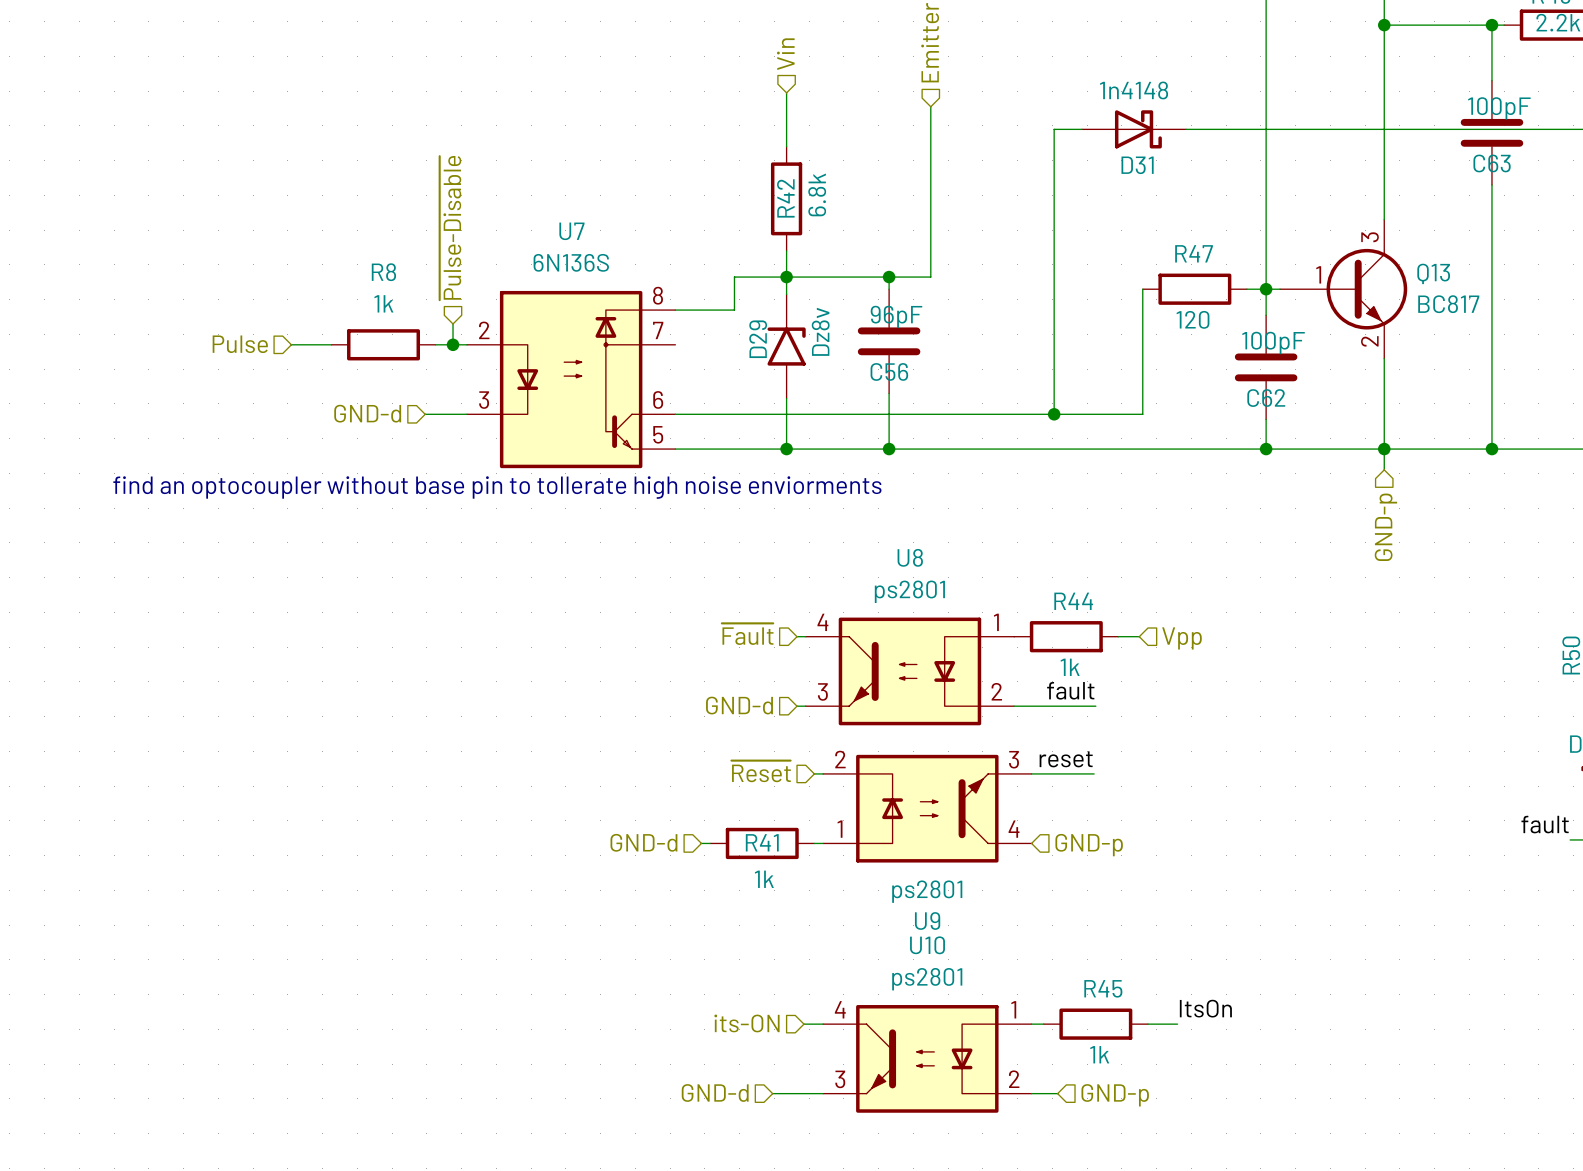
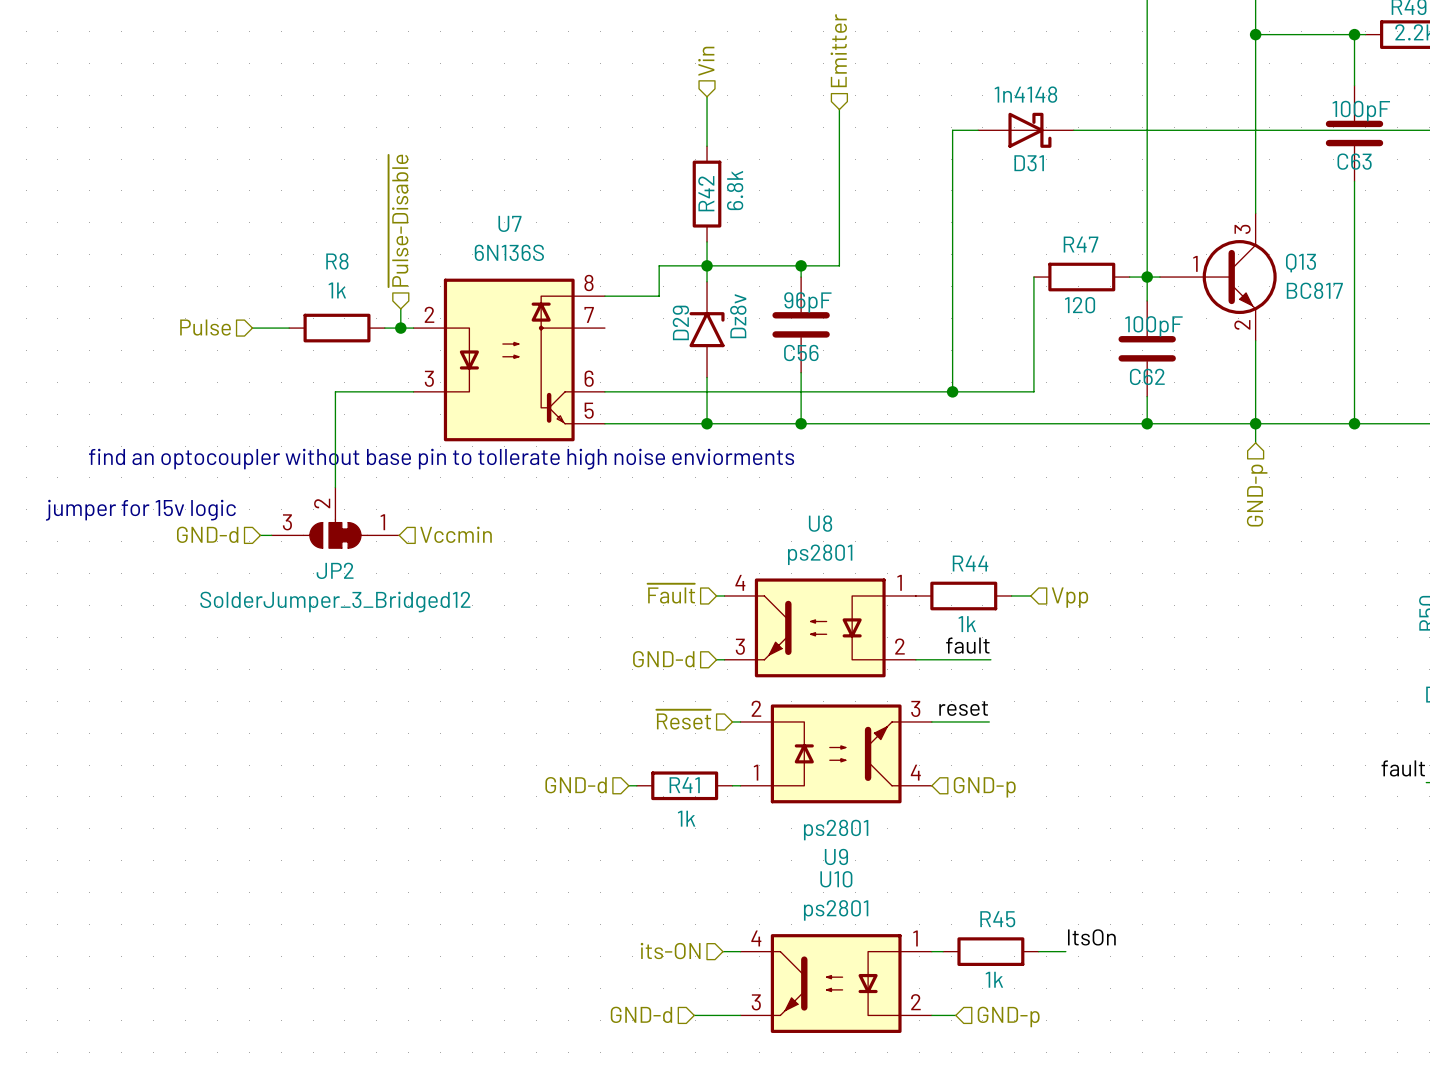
hierarchical label position: GND-d (367, 413) -> GND-d (207, 534)
wire: none -> (375, 391) (335, 391) (335, 487)
text: none -> jumper for 15v logic (140, 510)
JP2: none -> SolderJumper_3_Bridged12 (335, 517)
wire: none -> (260, 535) (271, 535)
hierarchical label: none -> Vccmin (456, 534)

